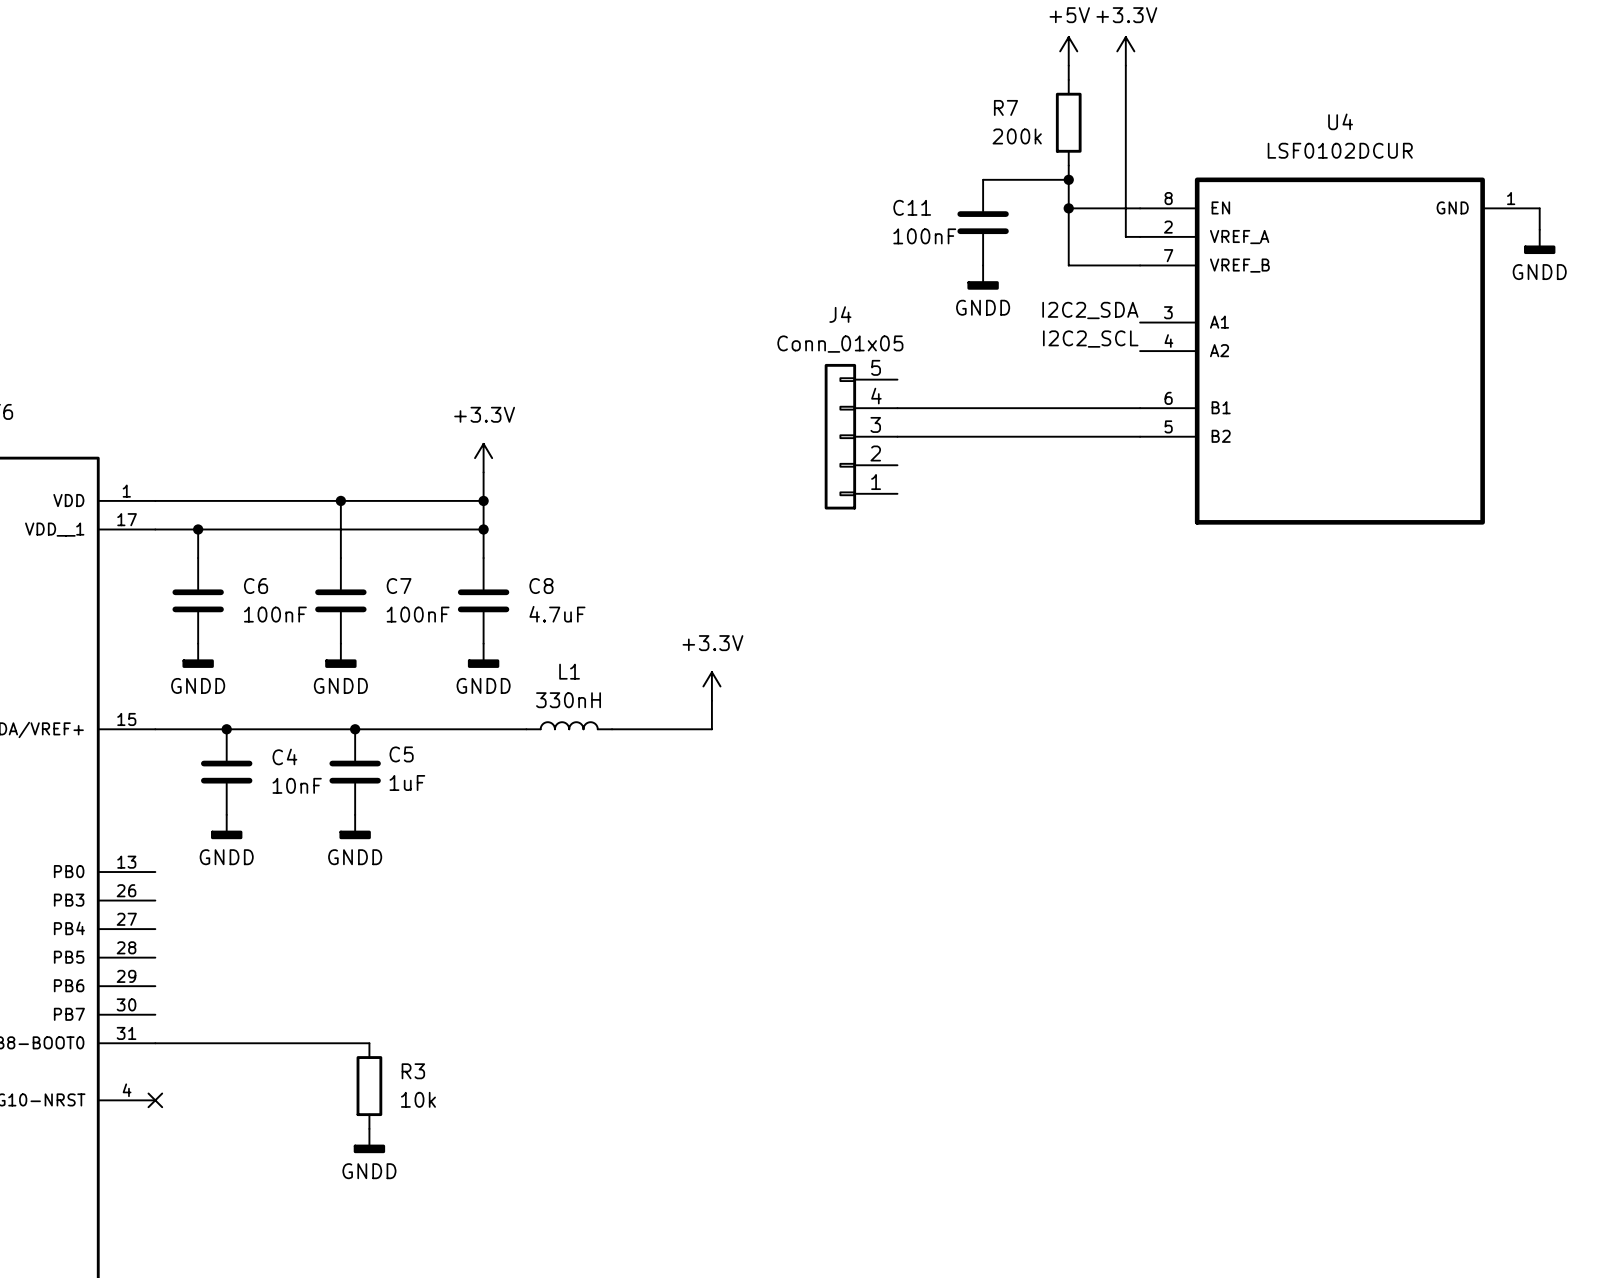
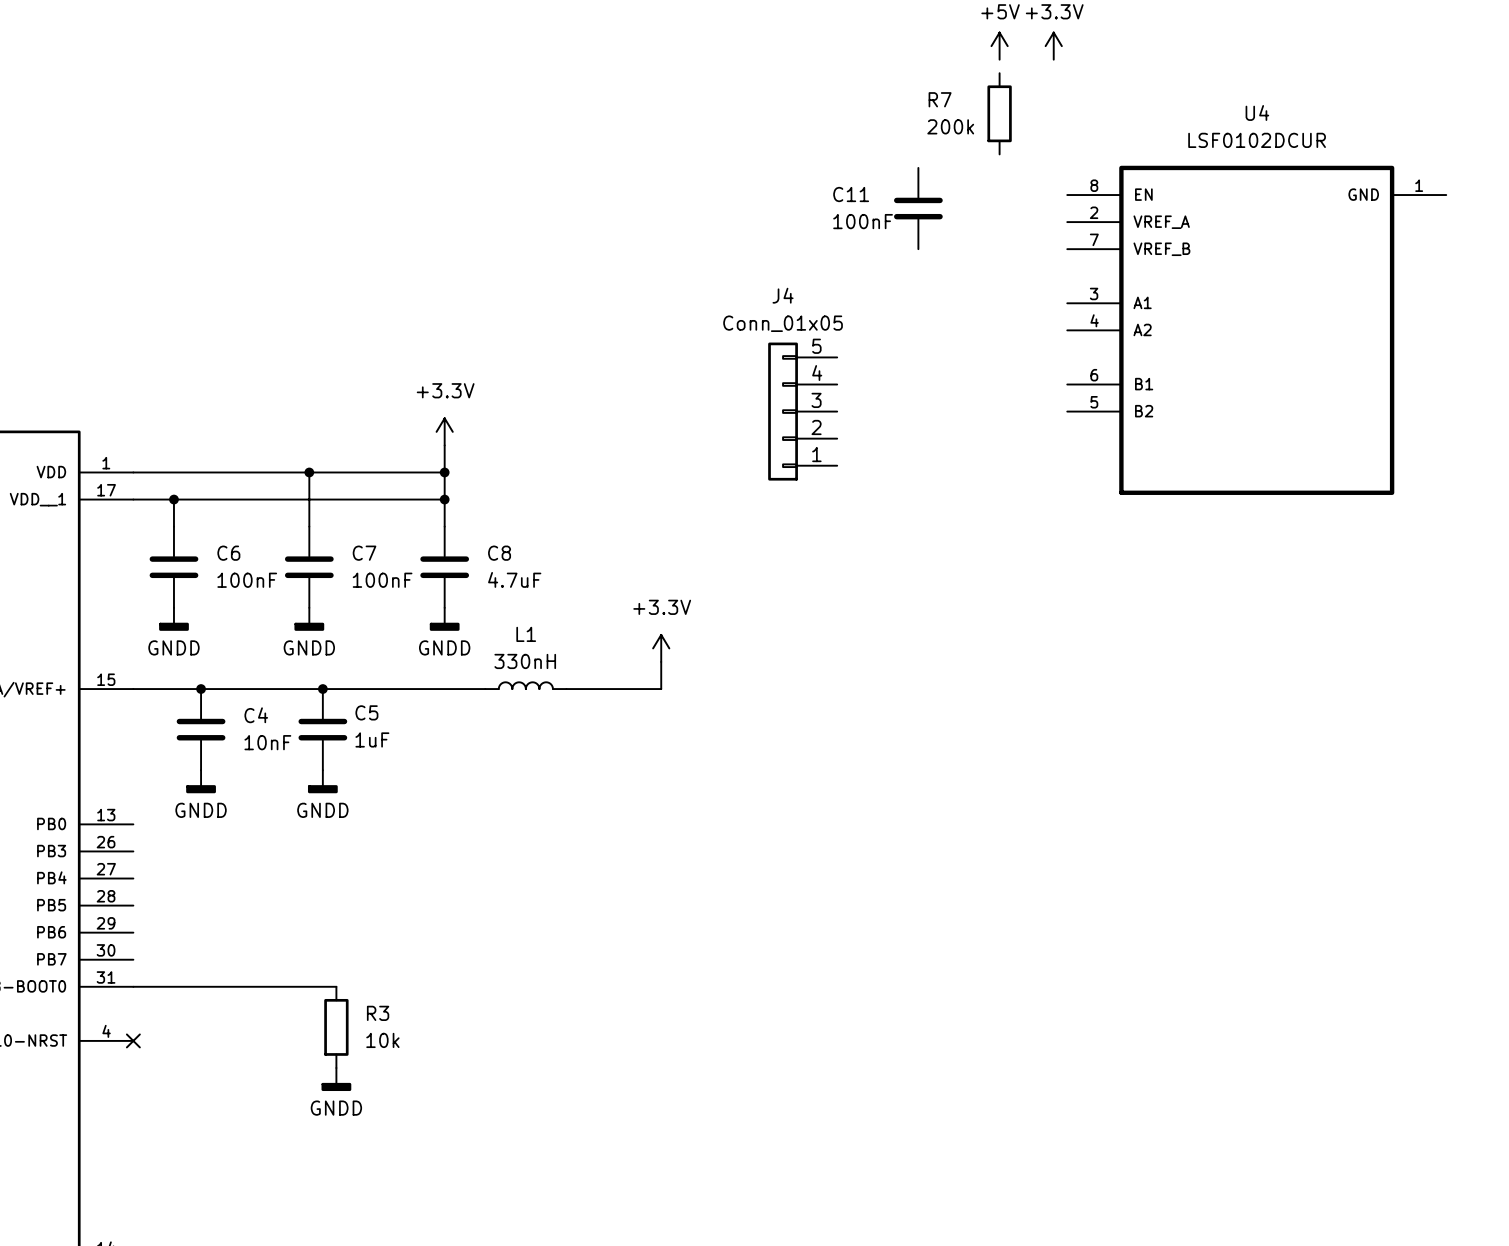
wire: (1068, 65) (1068, 79) -> none
wire: (1125, 65) (1125, 236) (1140, 236) -> none
wire: (1068, 165) (1068, 265) (1140, 265) -> none
wire: (983, 179) (1068, 179) -> none
junction: (1068, 179) -> none
wire: (1068, 208) (1140, 208) -> none
junction: (1068, 208) -> none
wire: (1539, 208) (1539, 229) -> none
power symbol: GNDD (1539, 241) -> none
power symbol: GNDD (983, 277) -> none
label: I2C2_SDA (1090, 310) -> none
label: I2C2_SCL (1090, 339) -> none
wire: (897, 408) (1140, 408) -> none
wire: (897, 436) (1140, 436) -> none

